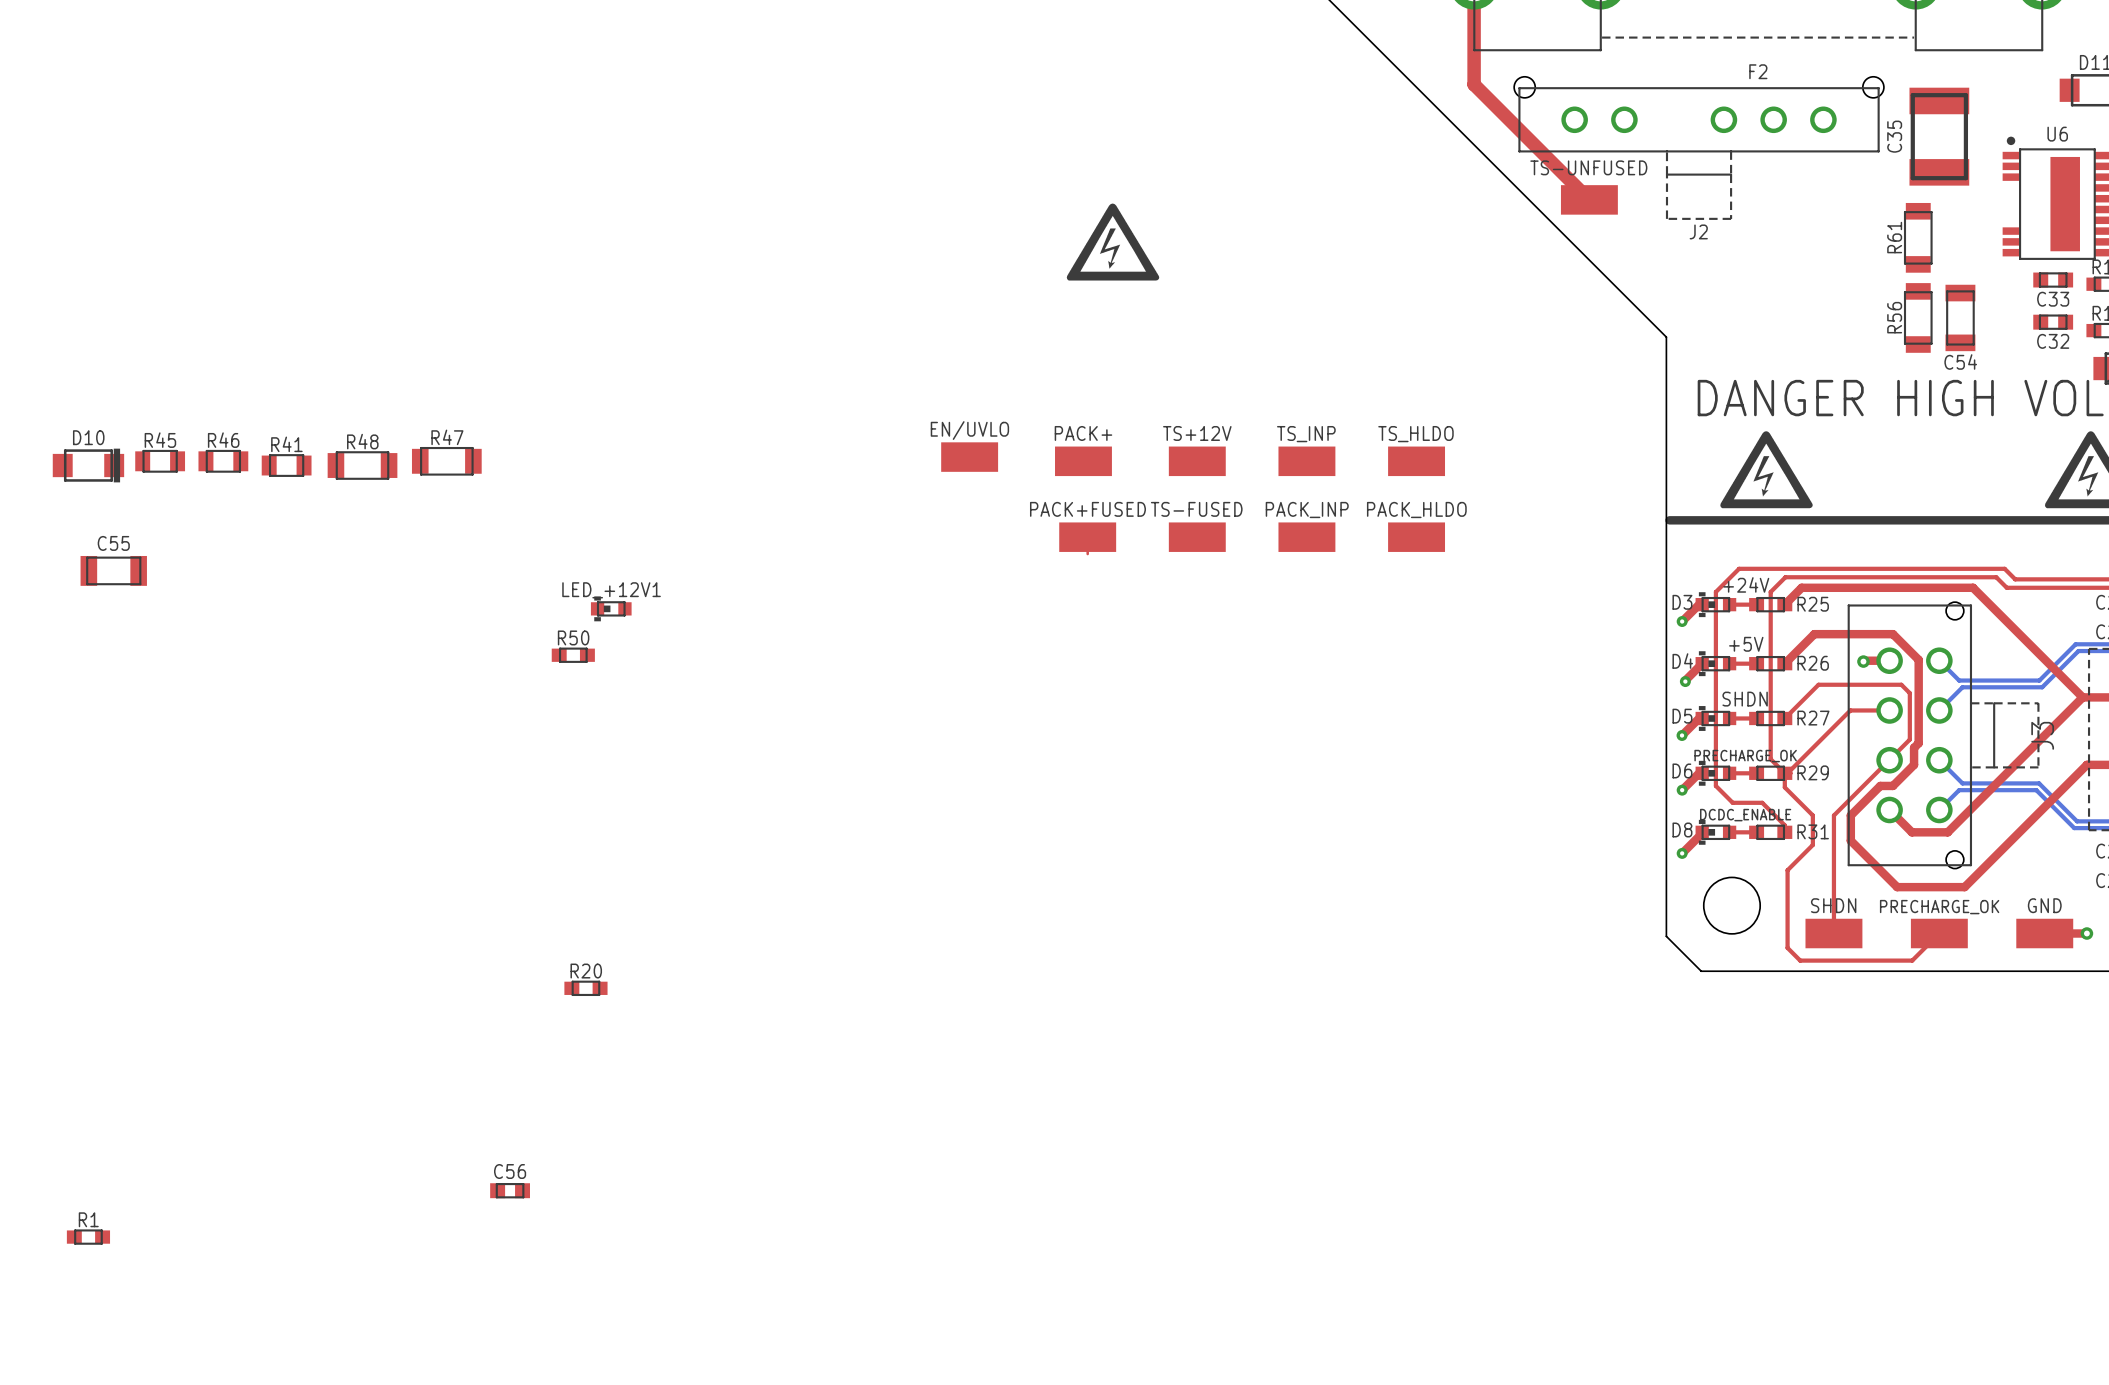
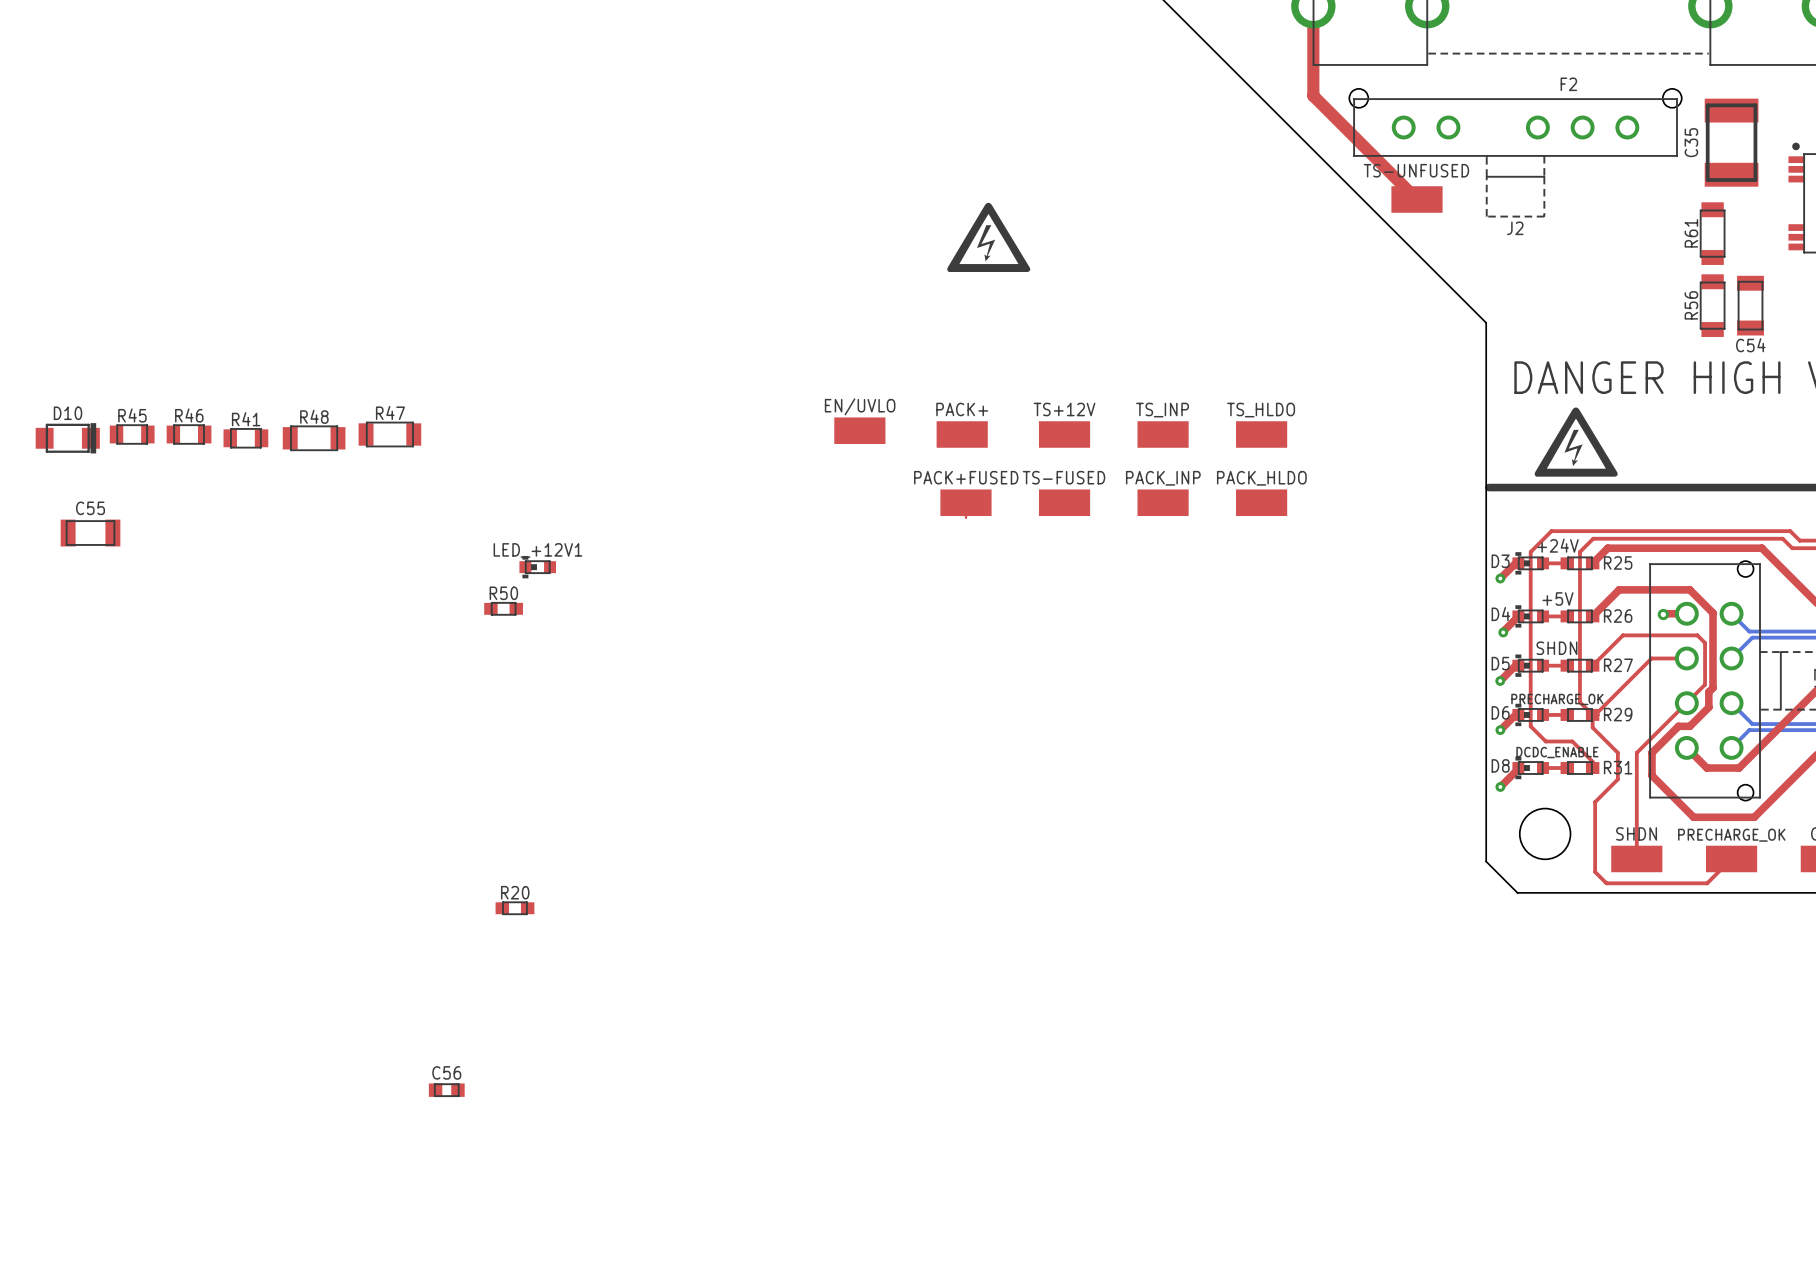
R1: (88, 1237) -> none

